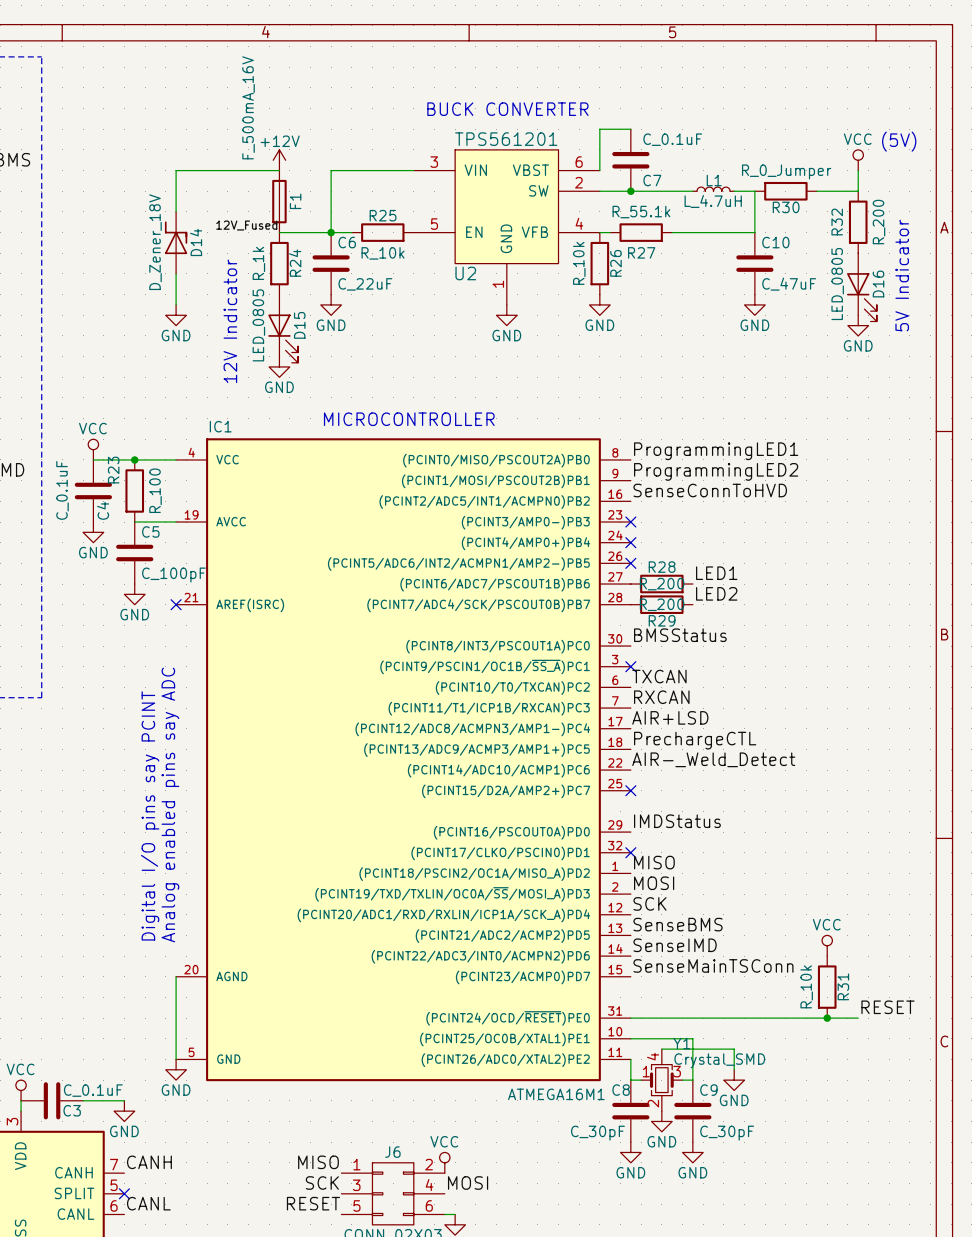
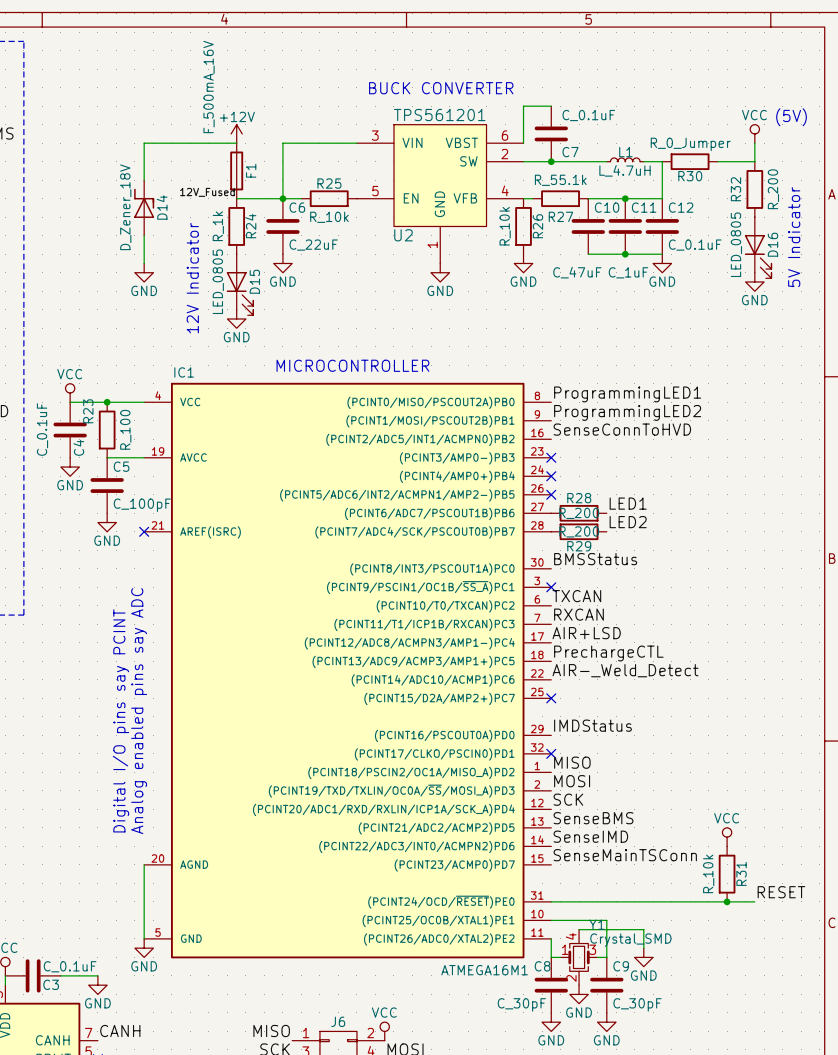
junction: none -> (625, 198)
C10 name: C10 (775, 242) -> C12 (681, 207)
C10: none -> C_47uF (588, 226)
C11: none -> C_1uF (625, 226)
C10 value: C_47uF (789, 284) -> C_0.1uF (695, 245)
wire: none -> (588, 254) (662, 254)
junction: none -> (625, 254)

